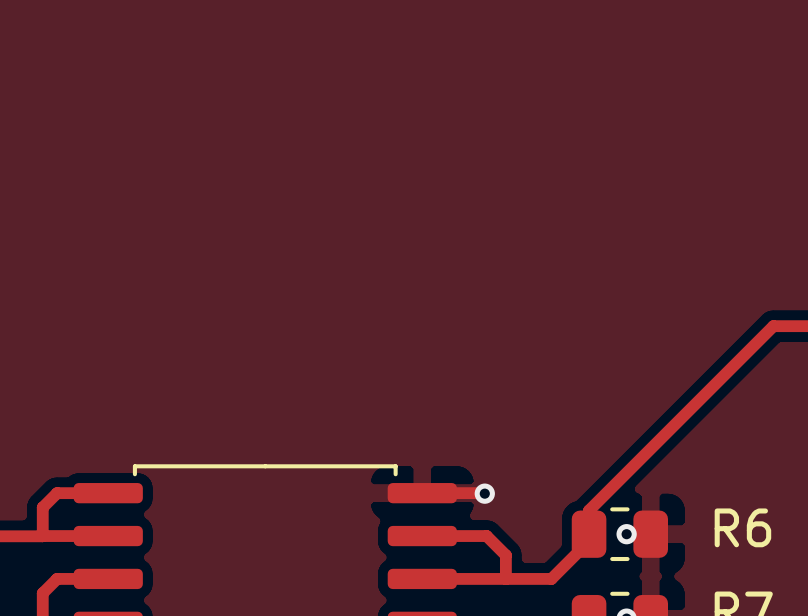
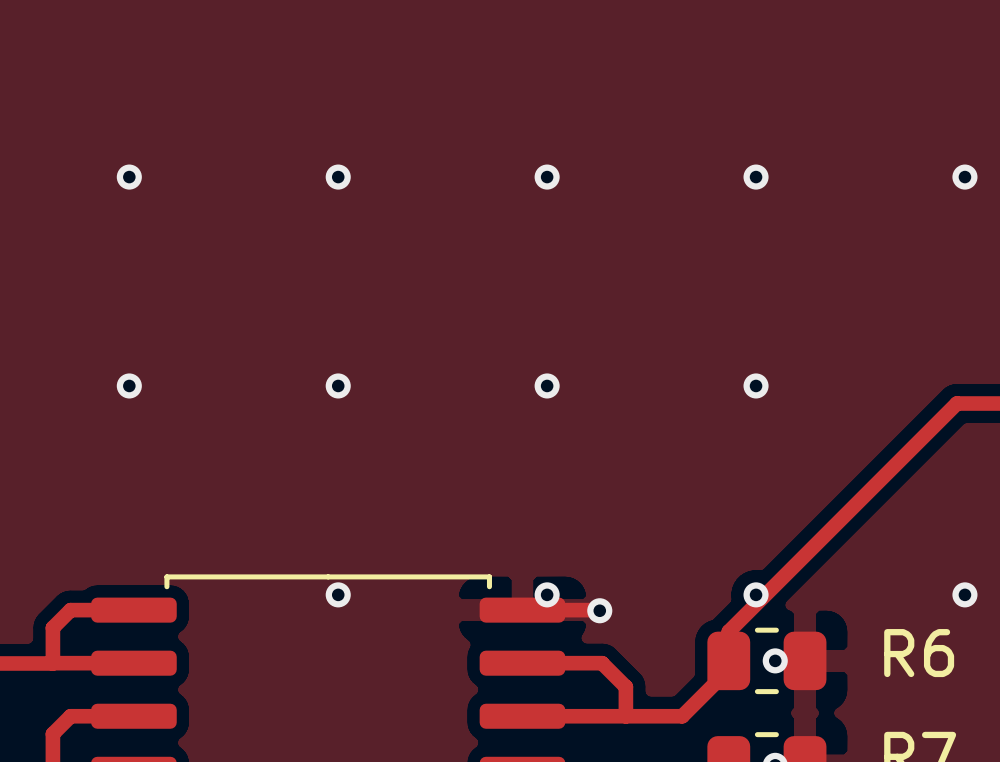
via: none -> (129, 177)
via: none -> (338, 177)
via: none -> (547, 177)
via: none -> (756, 177)
via: none -> (964, 177)
via: none -> (129, 385)
via: none -> (338, 385)
via: none -> (547, 385)
via: none -> (756, 385)
via: none -> (338, 594)
via: none -> (547, 594)
via: none -> (756, 594)
via: none -> (964, 594)

